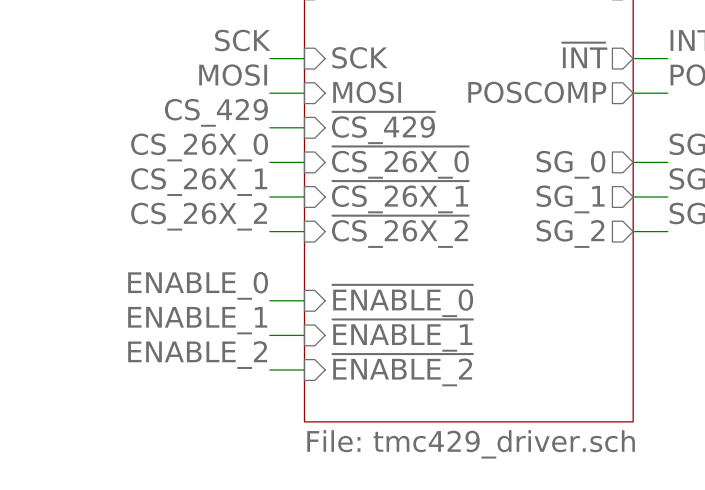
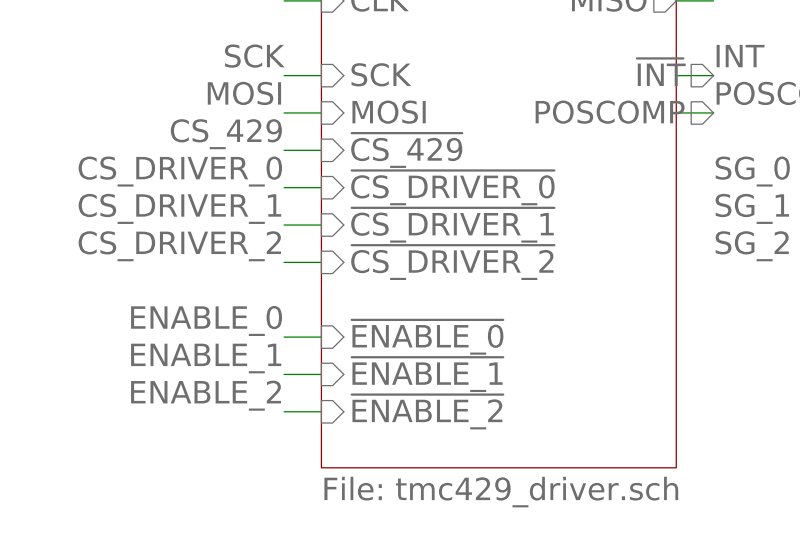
sheet pin position: ~{INT} (584, 55) -> ~{INT} (661, 72)
sheet pin position: POSCOMP (537, 92) -> POSCOMP (610, 112)
label: CS_26X_0 (199, 147) -> CS_DRIVER_0 (180, 171)
sheet pin: ~{CS_26X_0} (400, 162) -> ~{CS_DRIVER_0} (452, 187)
wire: (633, 162) (667, 162) -> none
sheet pin: SG_0 (570, 164) -> none
label: CS_26X_1 (199, 182) -> CS_DRIVER_1 (179, 208)
sheet pin: ~{CS_26X_1} (400, 197) -> ~{CS_DRIVER_1} (452, 225)
wire: (633, 197) (667, 197) -> none
sheet pin: SG_1 (570, 199) -> none
label: CS_26X_2 (199, 216) -> CS_DRIVER_2 (179, 246)
sheet pin: ~{CS_26X_2} (400, 231) -> ~{CS_DRIVER_2} (452, 262)
wire: (633, 231) (667, 231) -> none
sheet pin: SG_2 (570, 233) -> none

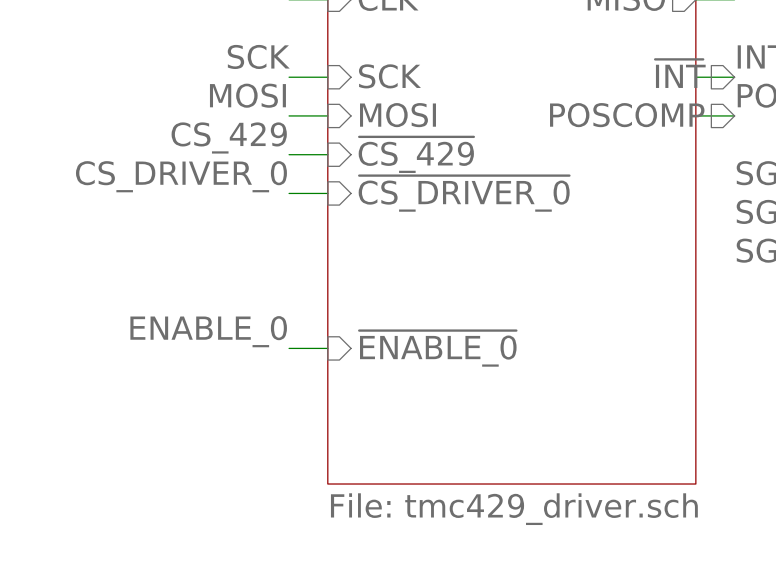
label: CS_DRIVER_1 (179, 208) -> none
wire: (284, 225) (321, 225) -> none
sheet pin: ~{CS_DRIVER_1} (452, 225) -> none
label: CS_DRIVER_2 (179, 246) -> none
wire: (284, 262) (321, 262) -> none
sheet pin: ~{CS_DRIVER_2} (452, 262) -> none
label: ENABLE_1 (206, 358) -> none
wire: (284, 374) (321, 374) -> none
sheet pin: ~{ENABLE_1} (427, 374) -> none
label: ENABLE_2 (206, 395) -> none
wire: (284, 411) (321, 411) -> none
sheet pin: ~{ENABLE_2} (427, 411) -> none

